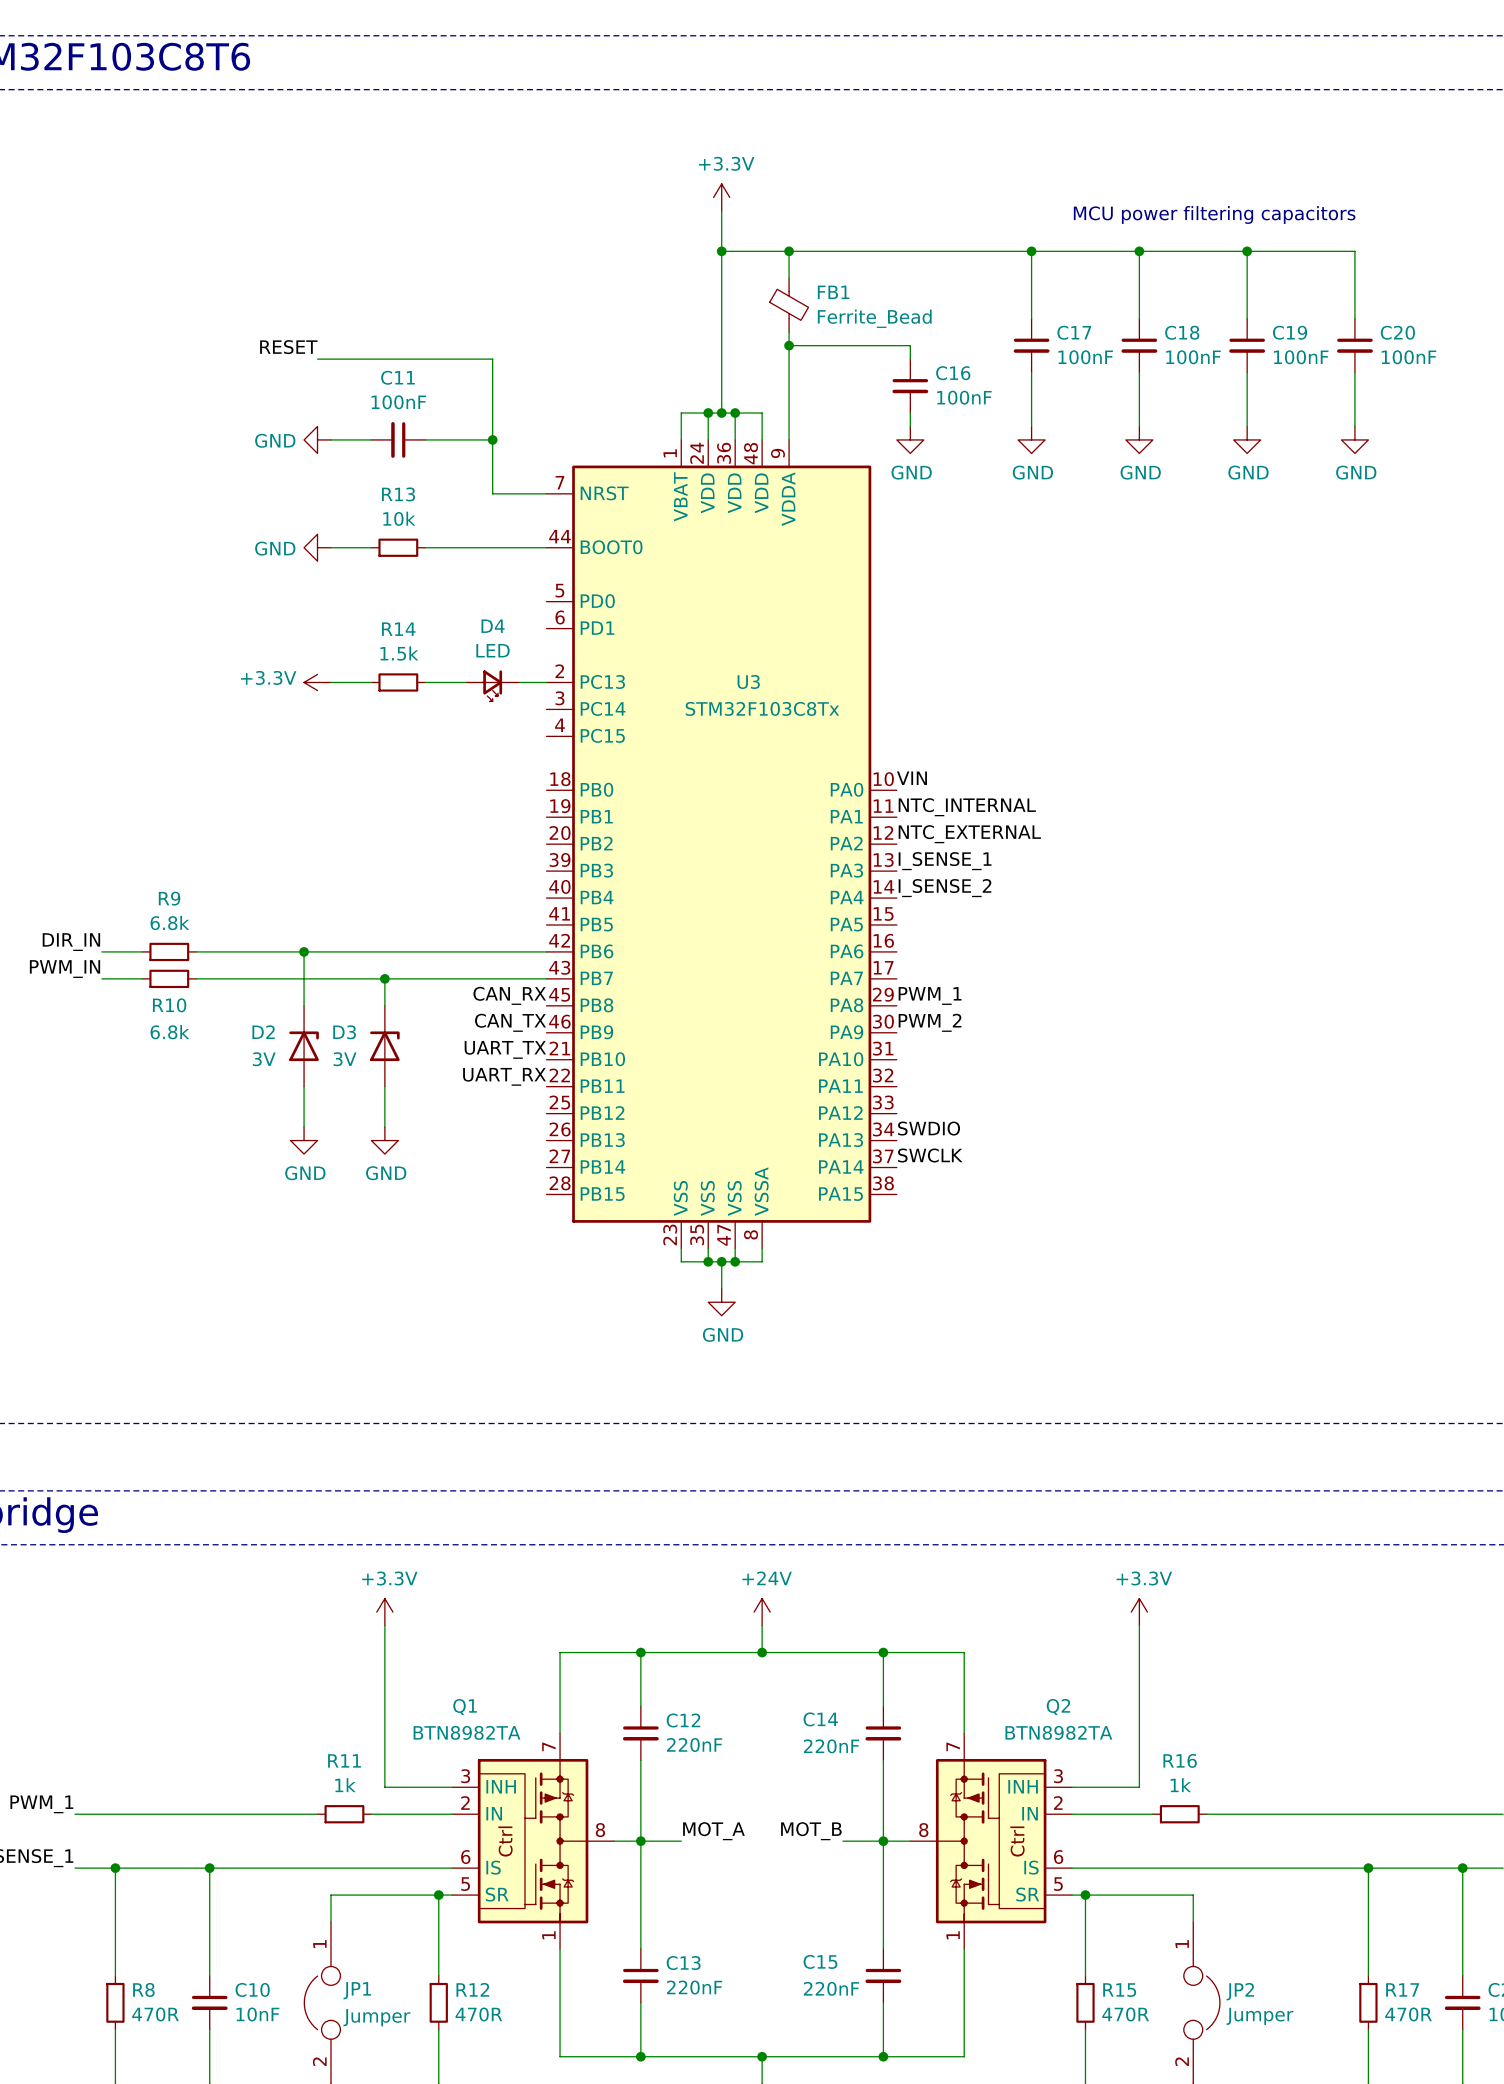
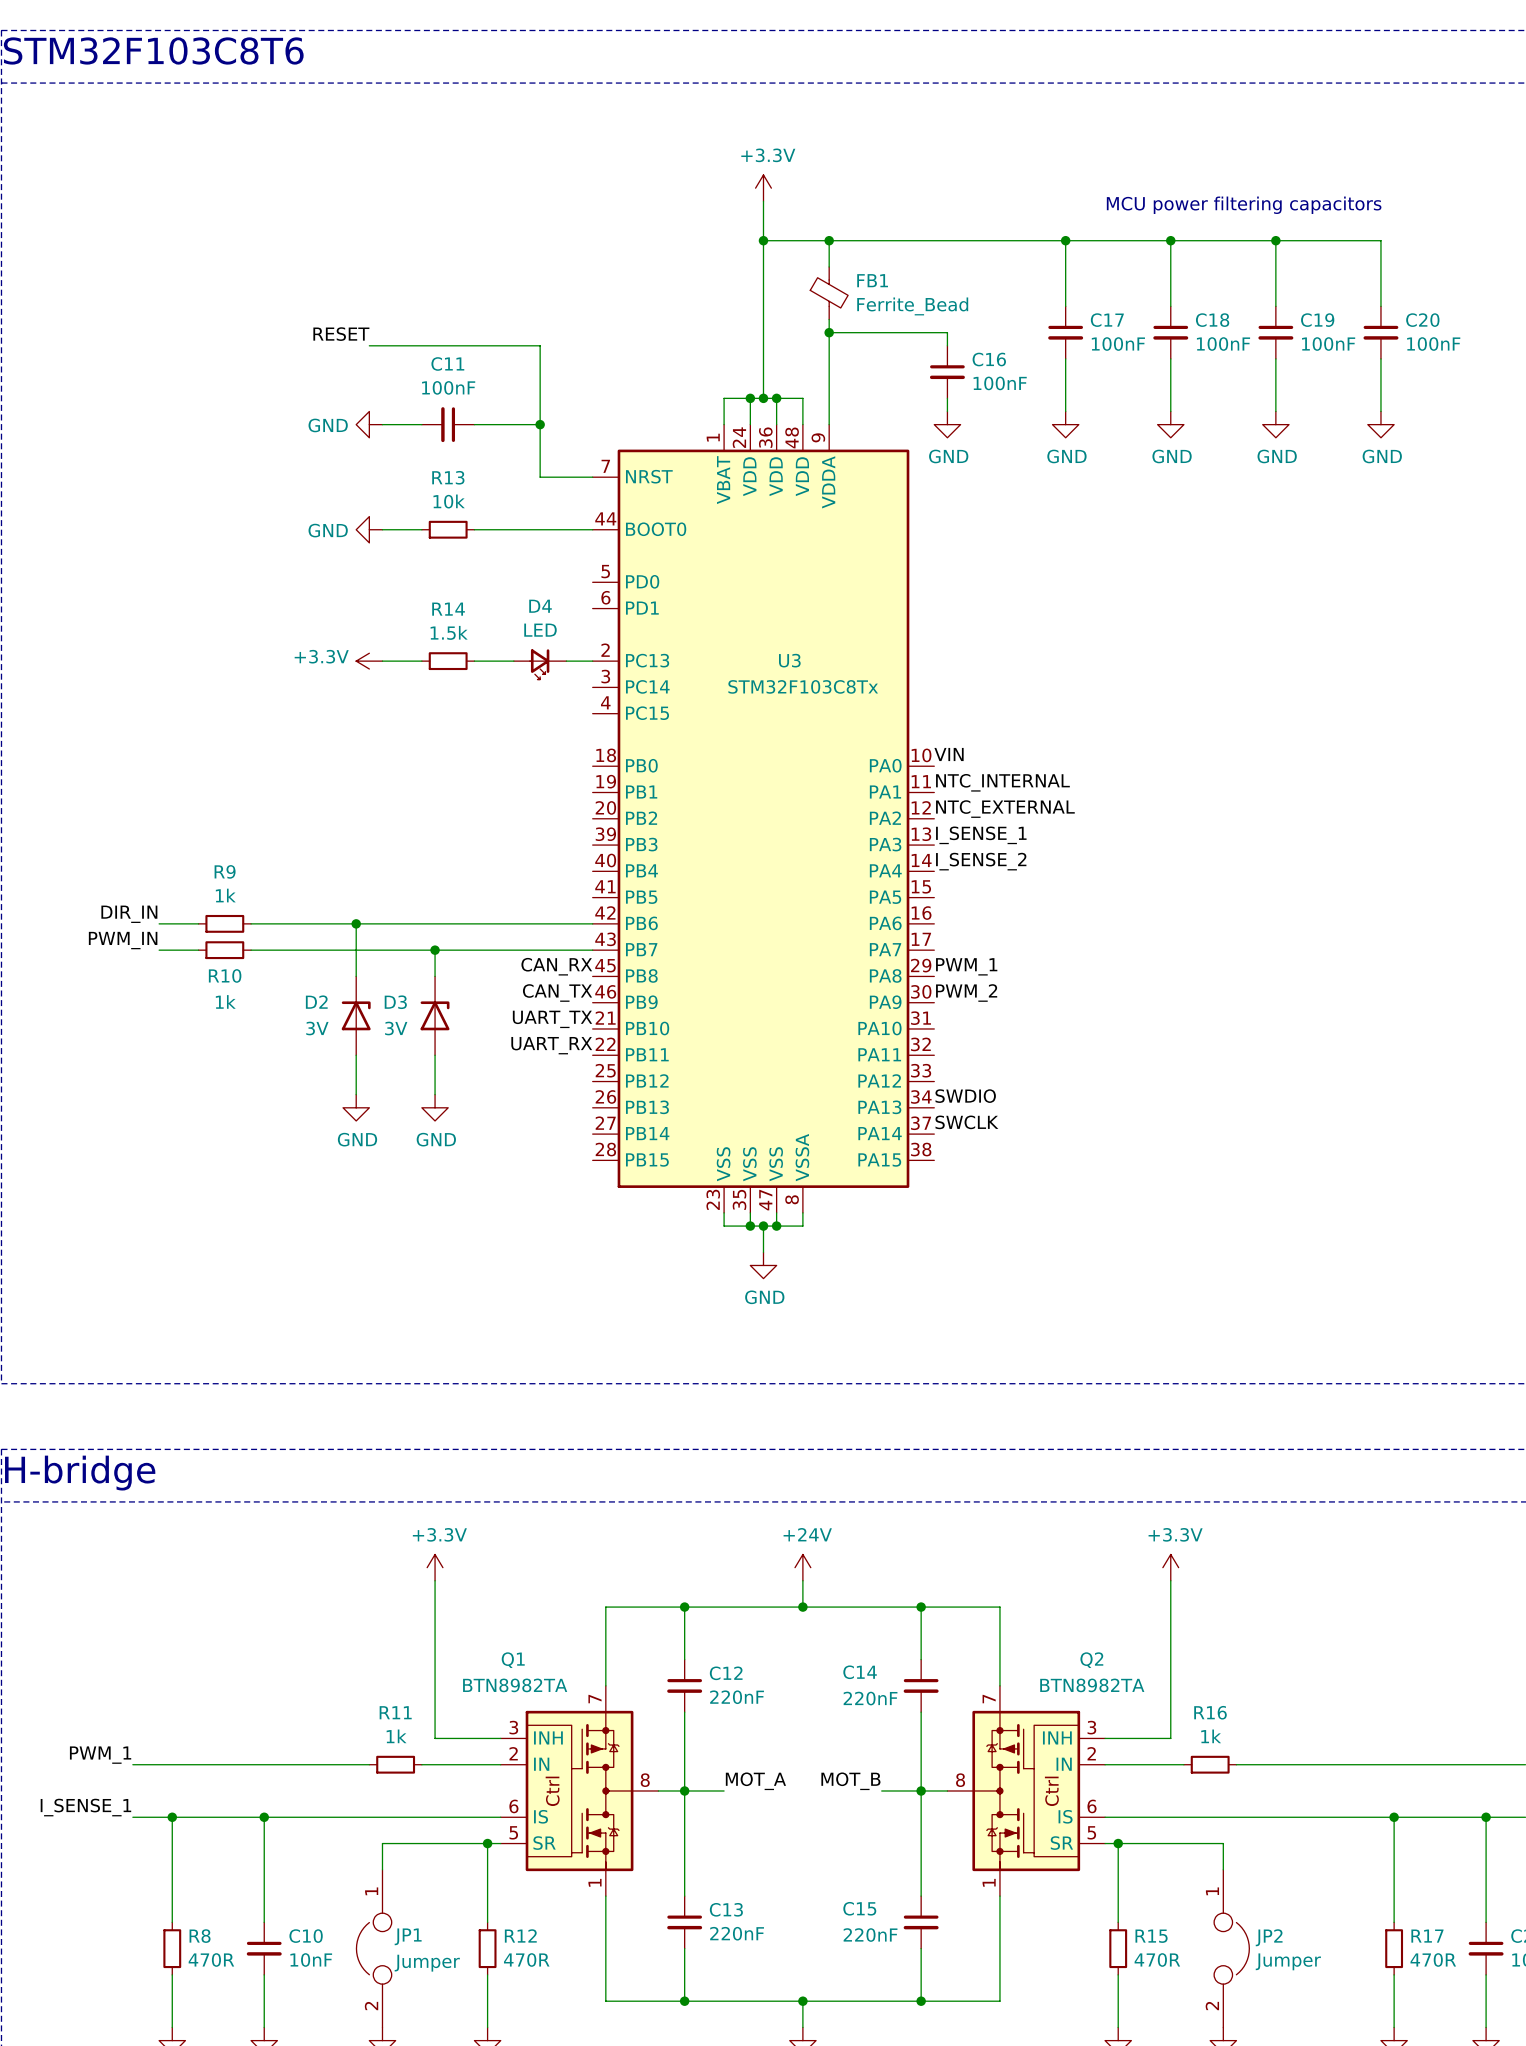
R9 value: 6.8k (169, 922) -> 1k (225, 895)
R10 value: 6.8k (169, 1032) -> 1k (225, 1001)

